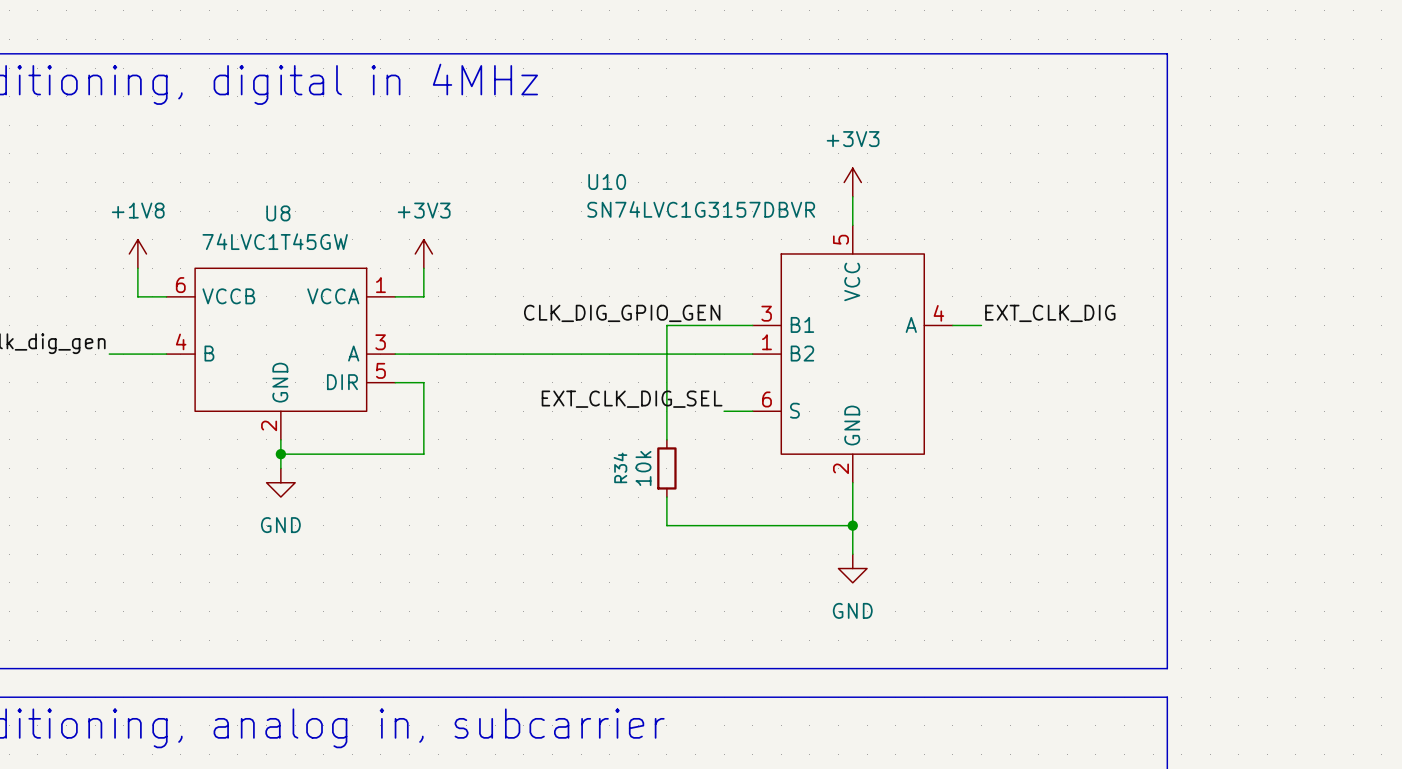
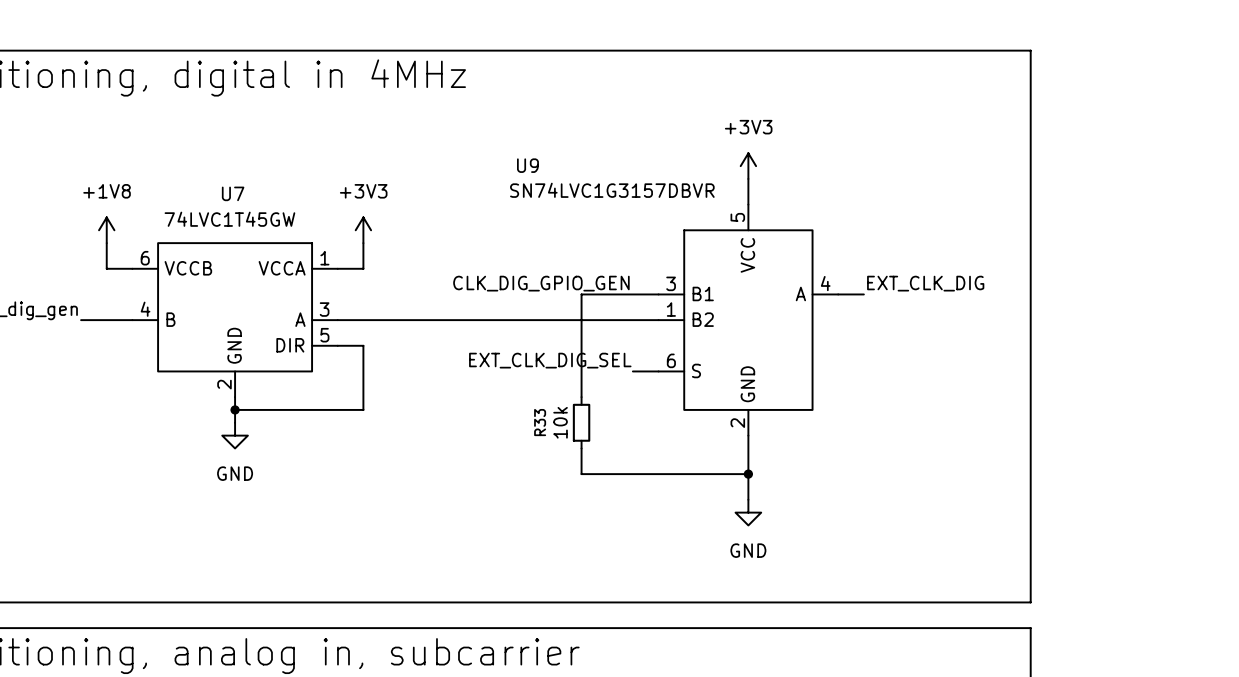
U10 name: U10 (607, 181) -> U9 (527, 165)
U8 name: U8 (278, 213) -> U7 (233, 193)
R34 name: R34 (620, 467) -> R33 (540, 422)

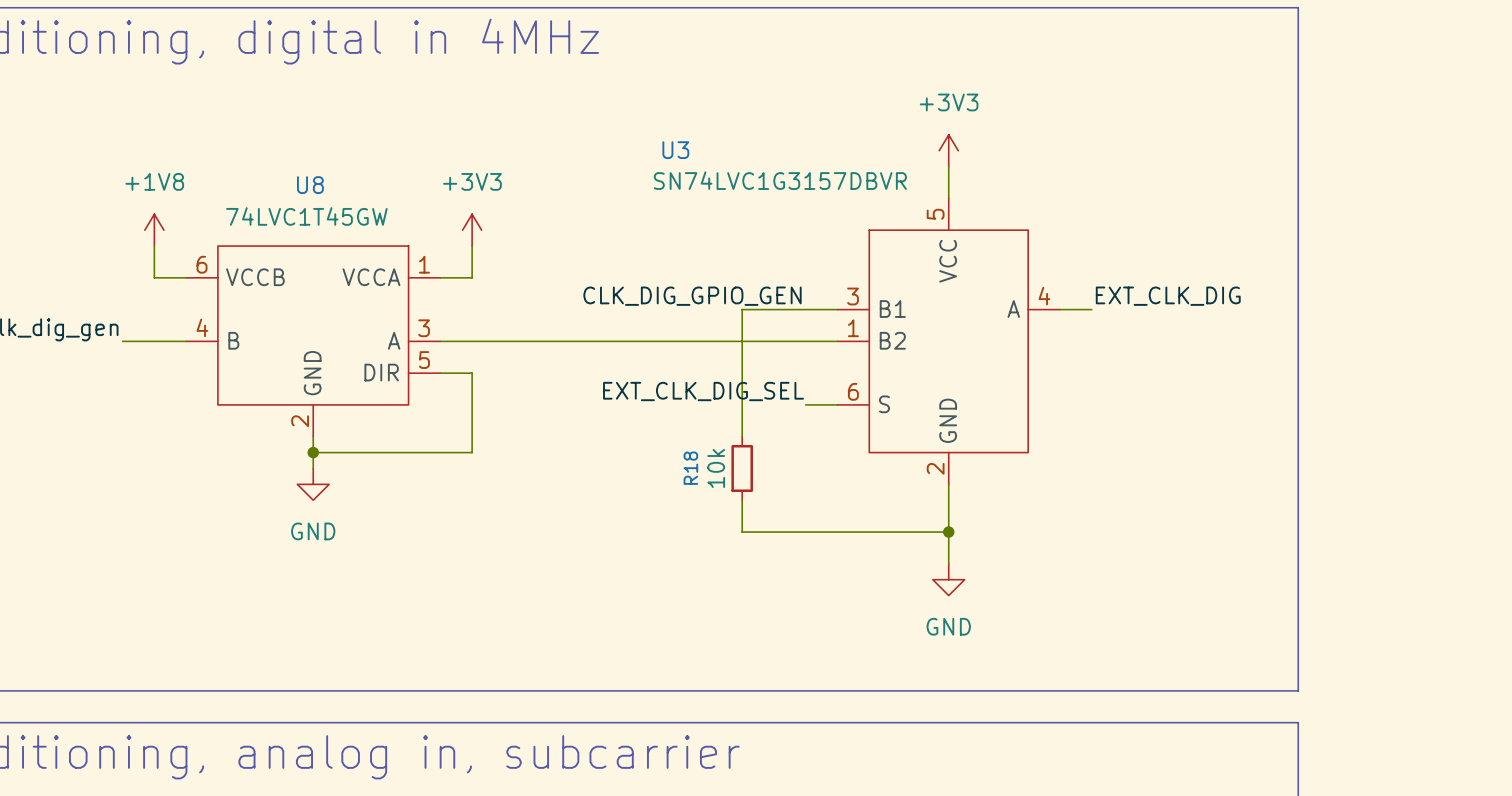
U9 name: U9 (527, 165) -> U3 (675, 150)
U7 name: U7 (233, 193) -> U8 (310, 185)
R33 name: R33 (540, 422) -> R18 (690, 468)

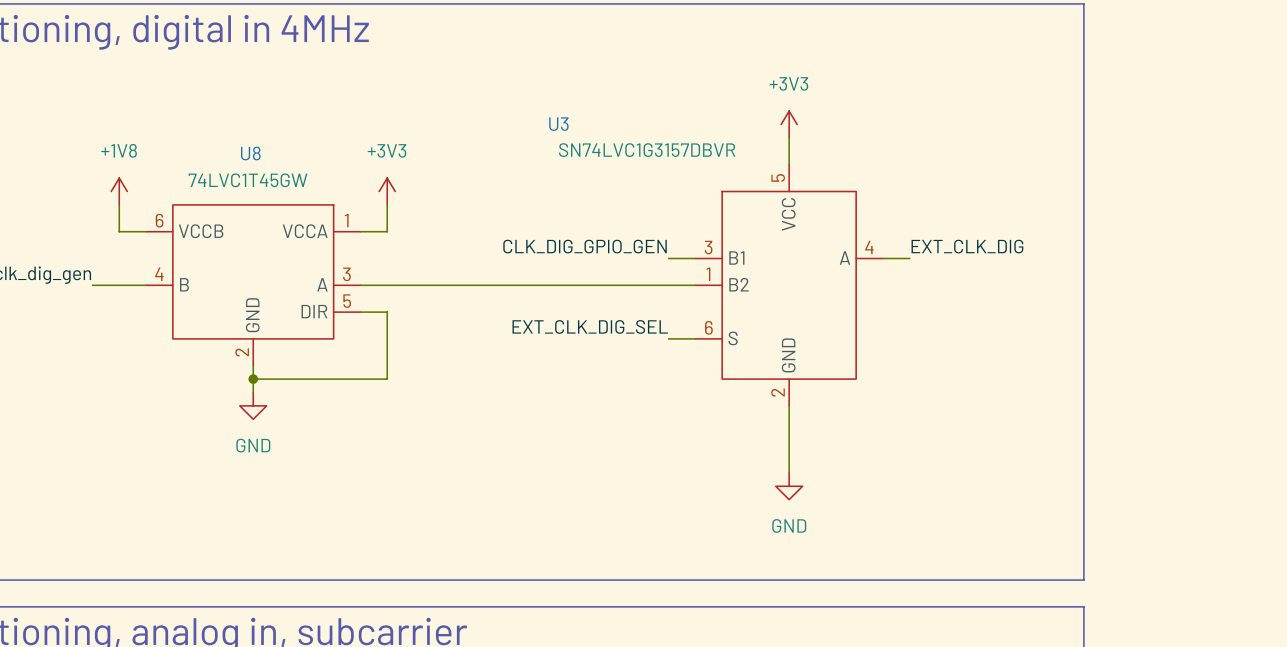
wire: (805, 309) (742, 309) (742, 436) -> none
R18: 10k (742, 468) -> none
wire: (742, 500) (742, 532) (948, 532) -> none
junction: (948, 532) -> none

